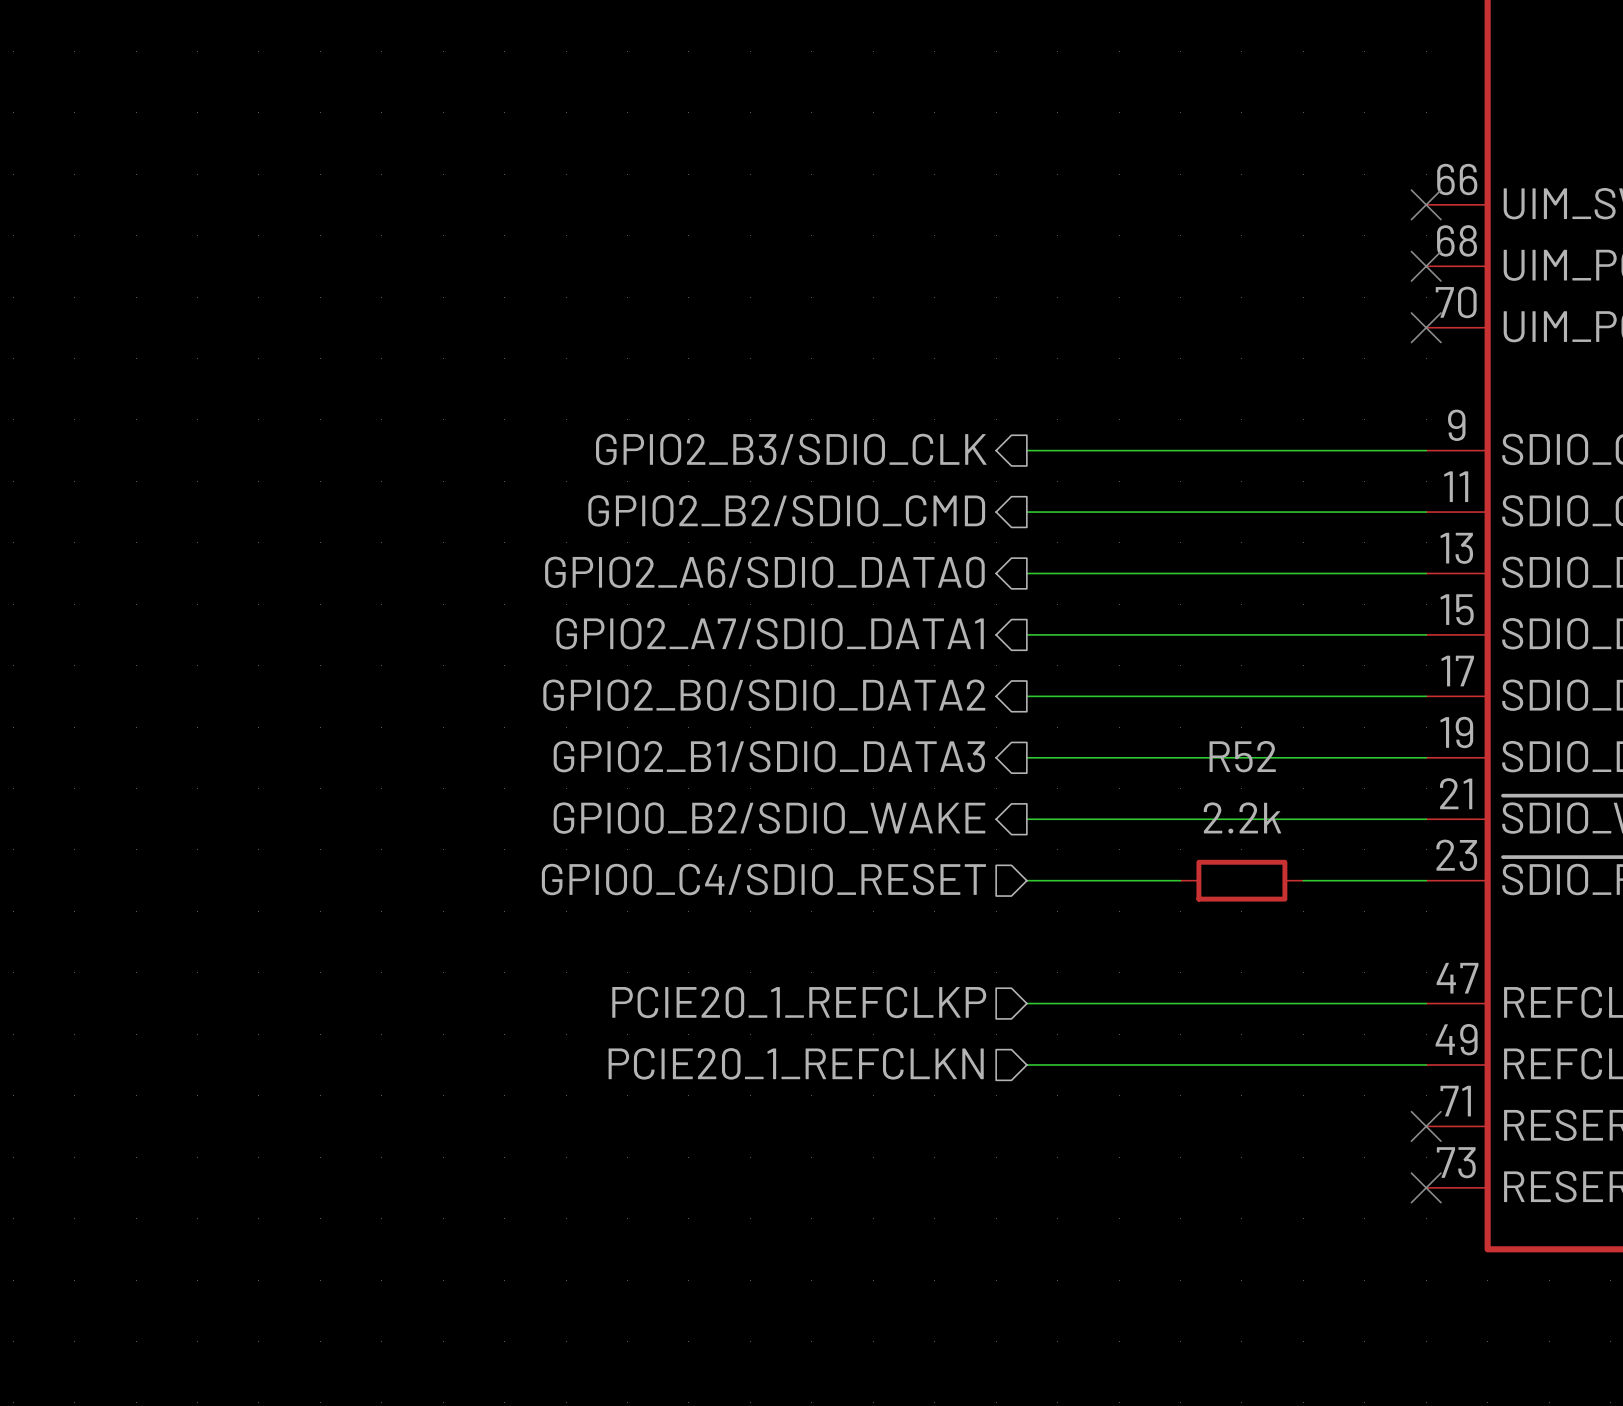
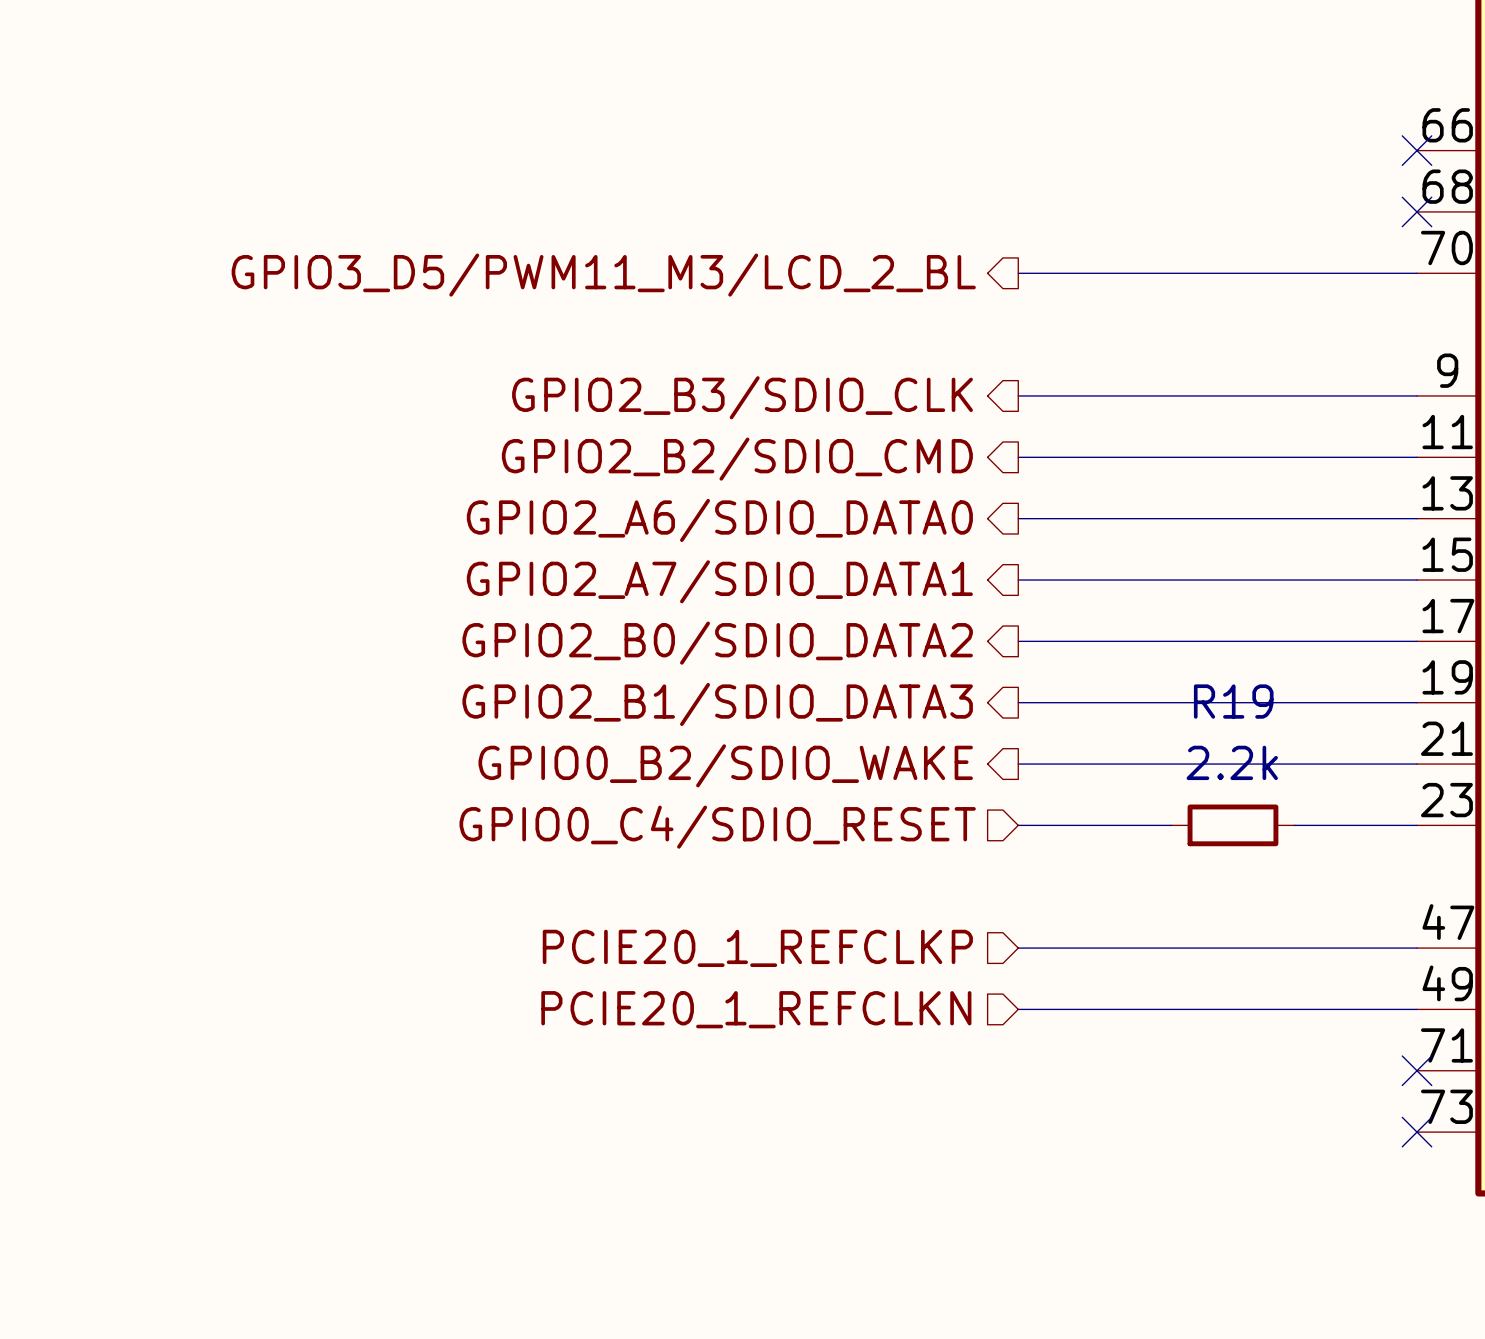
hierarchical label: none -> GPIO3_D5/PWM11_M3/LCD_2_BL (603, 275)
wire: none -> (1018, 273) (1417, 273)
no-connect mark: (1426, 327) -> none
R52 name: R52 (1242, 756) -> R19 (1233, 701)

